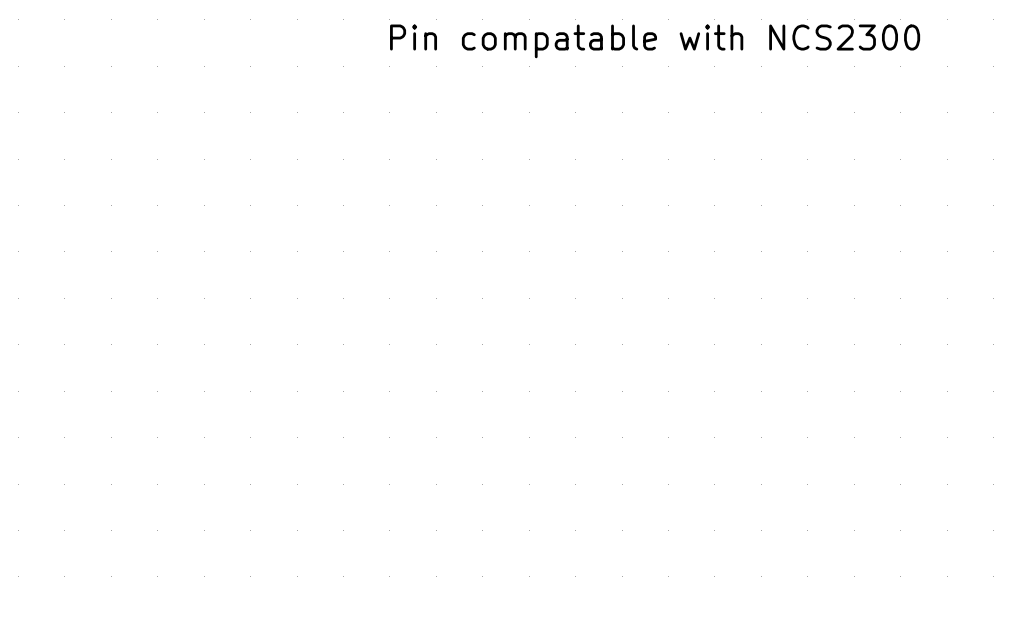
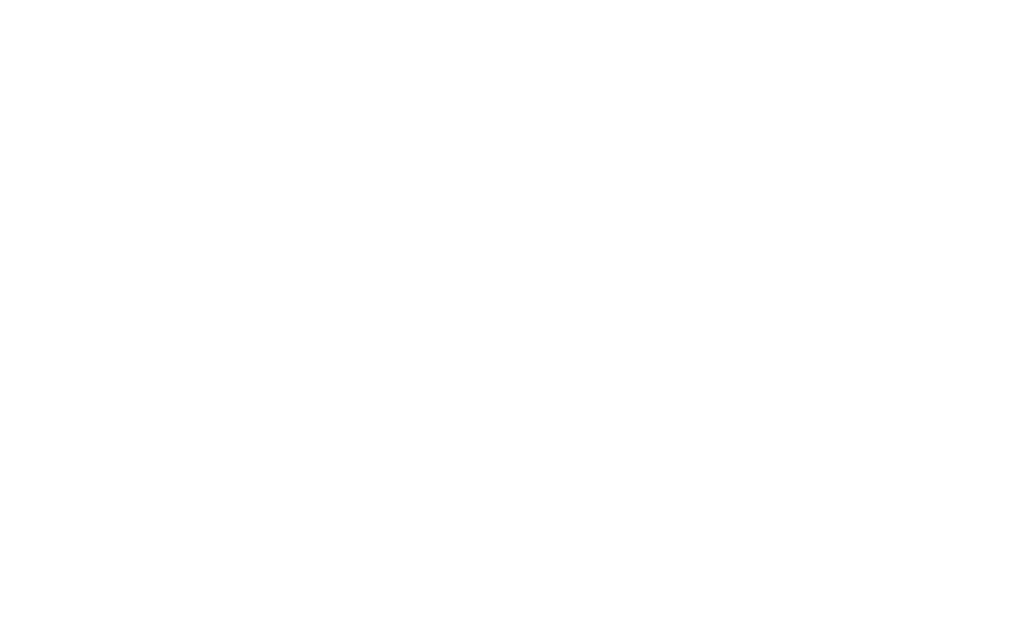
text: Pin compatable with NCS2300 (655, 41) -> none

